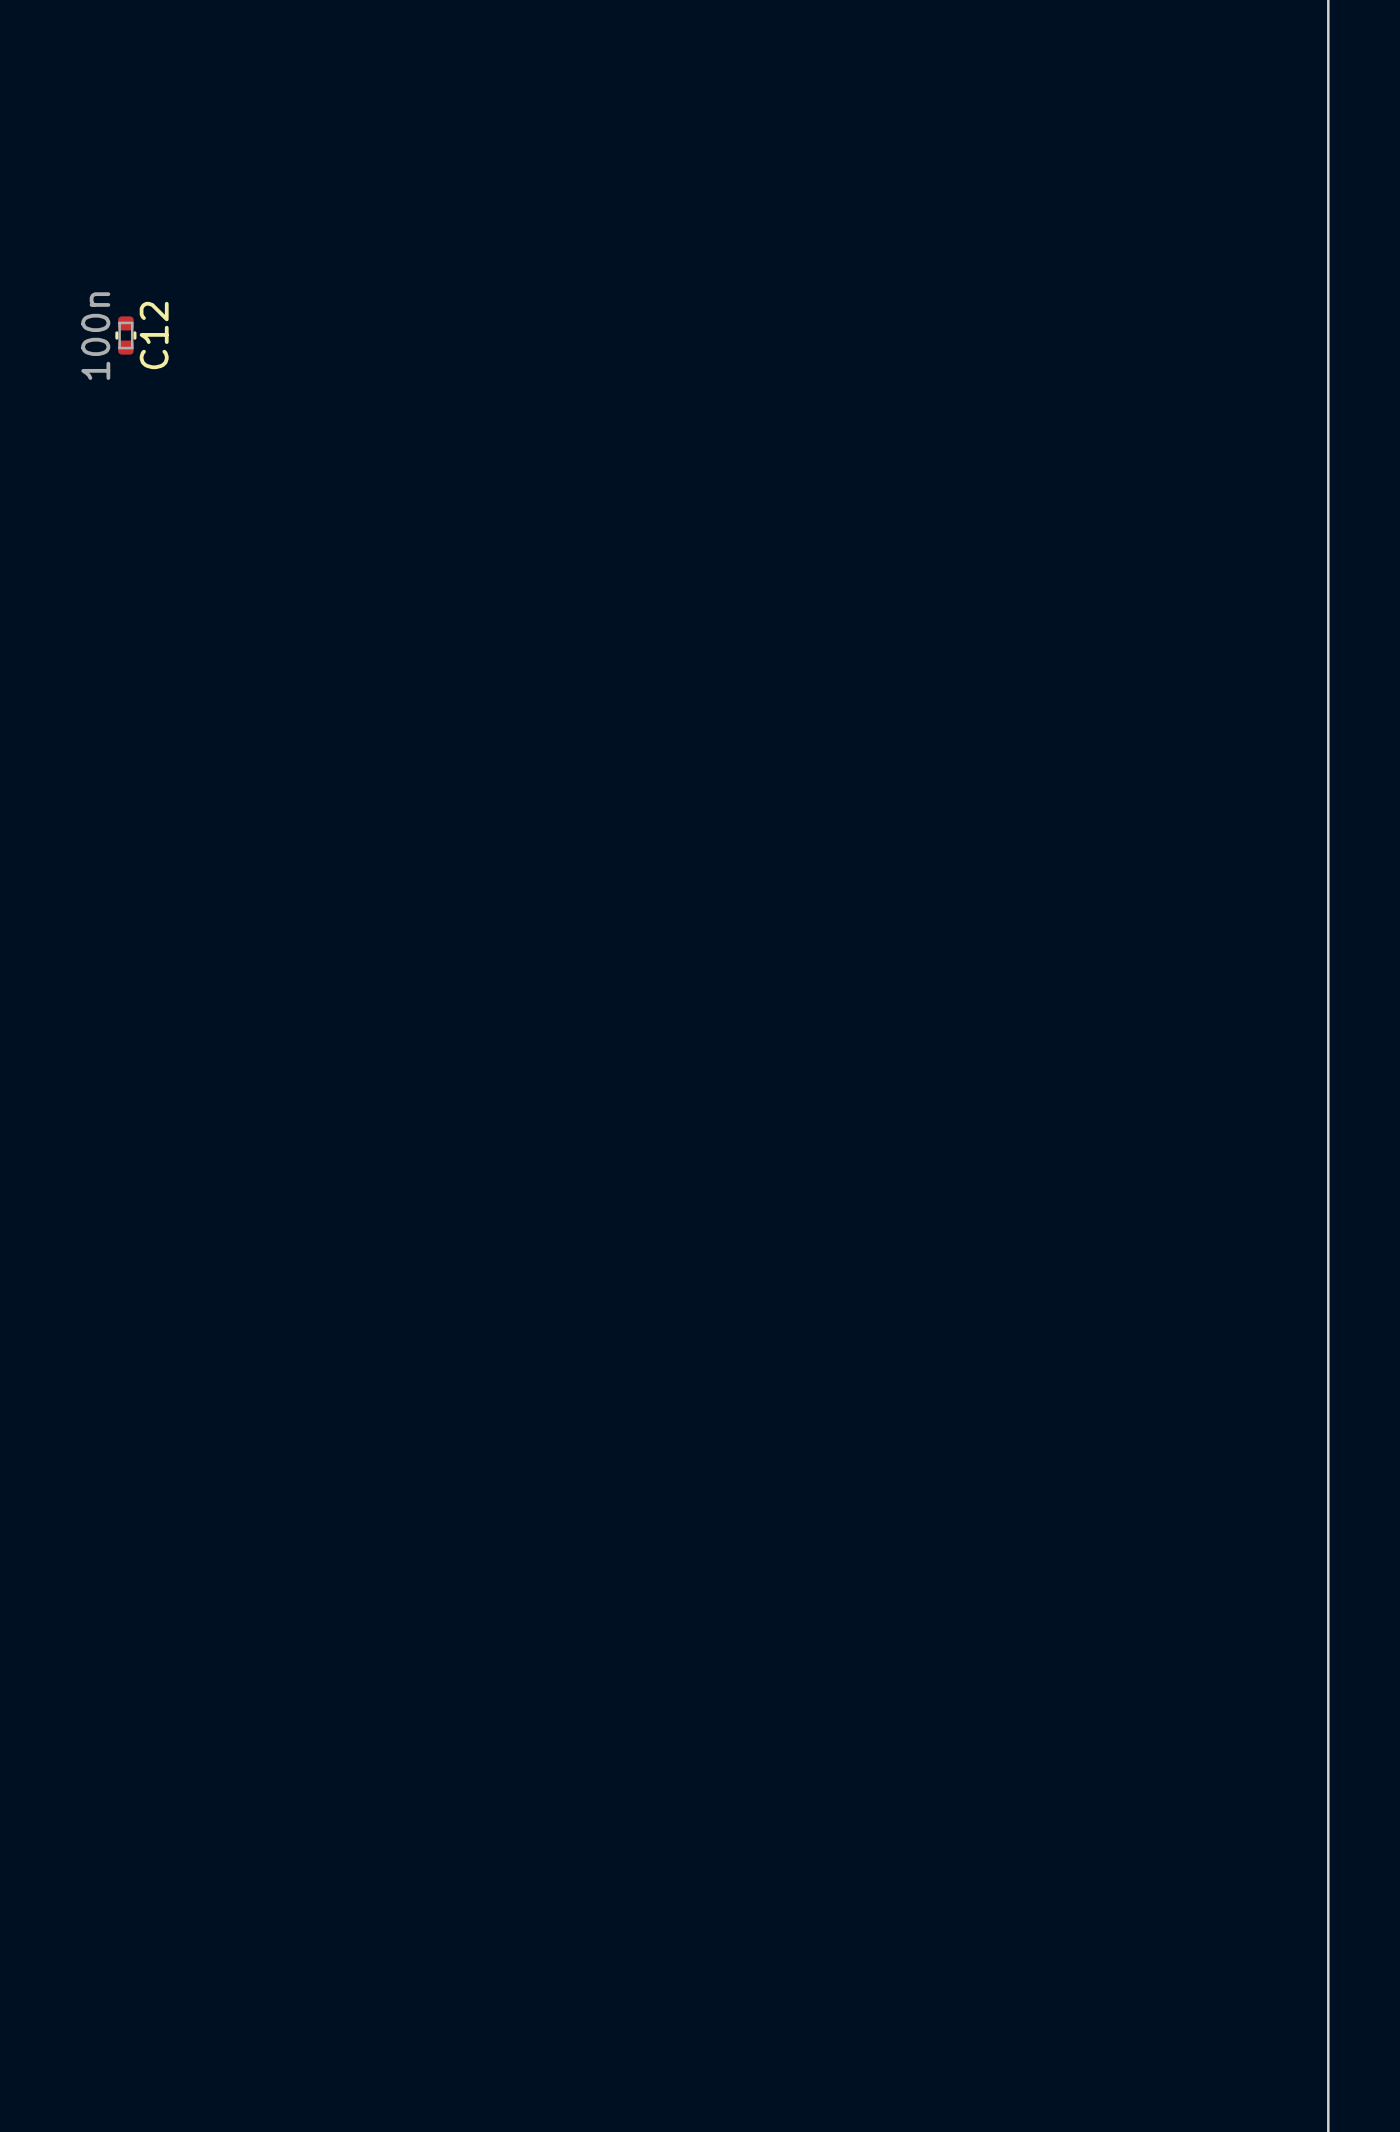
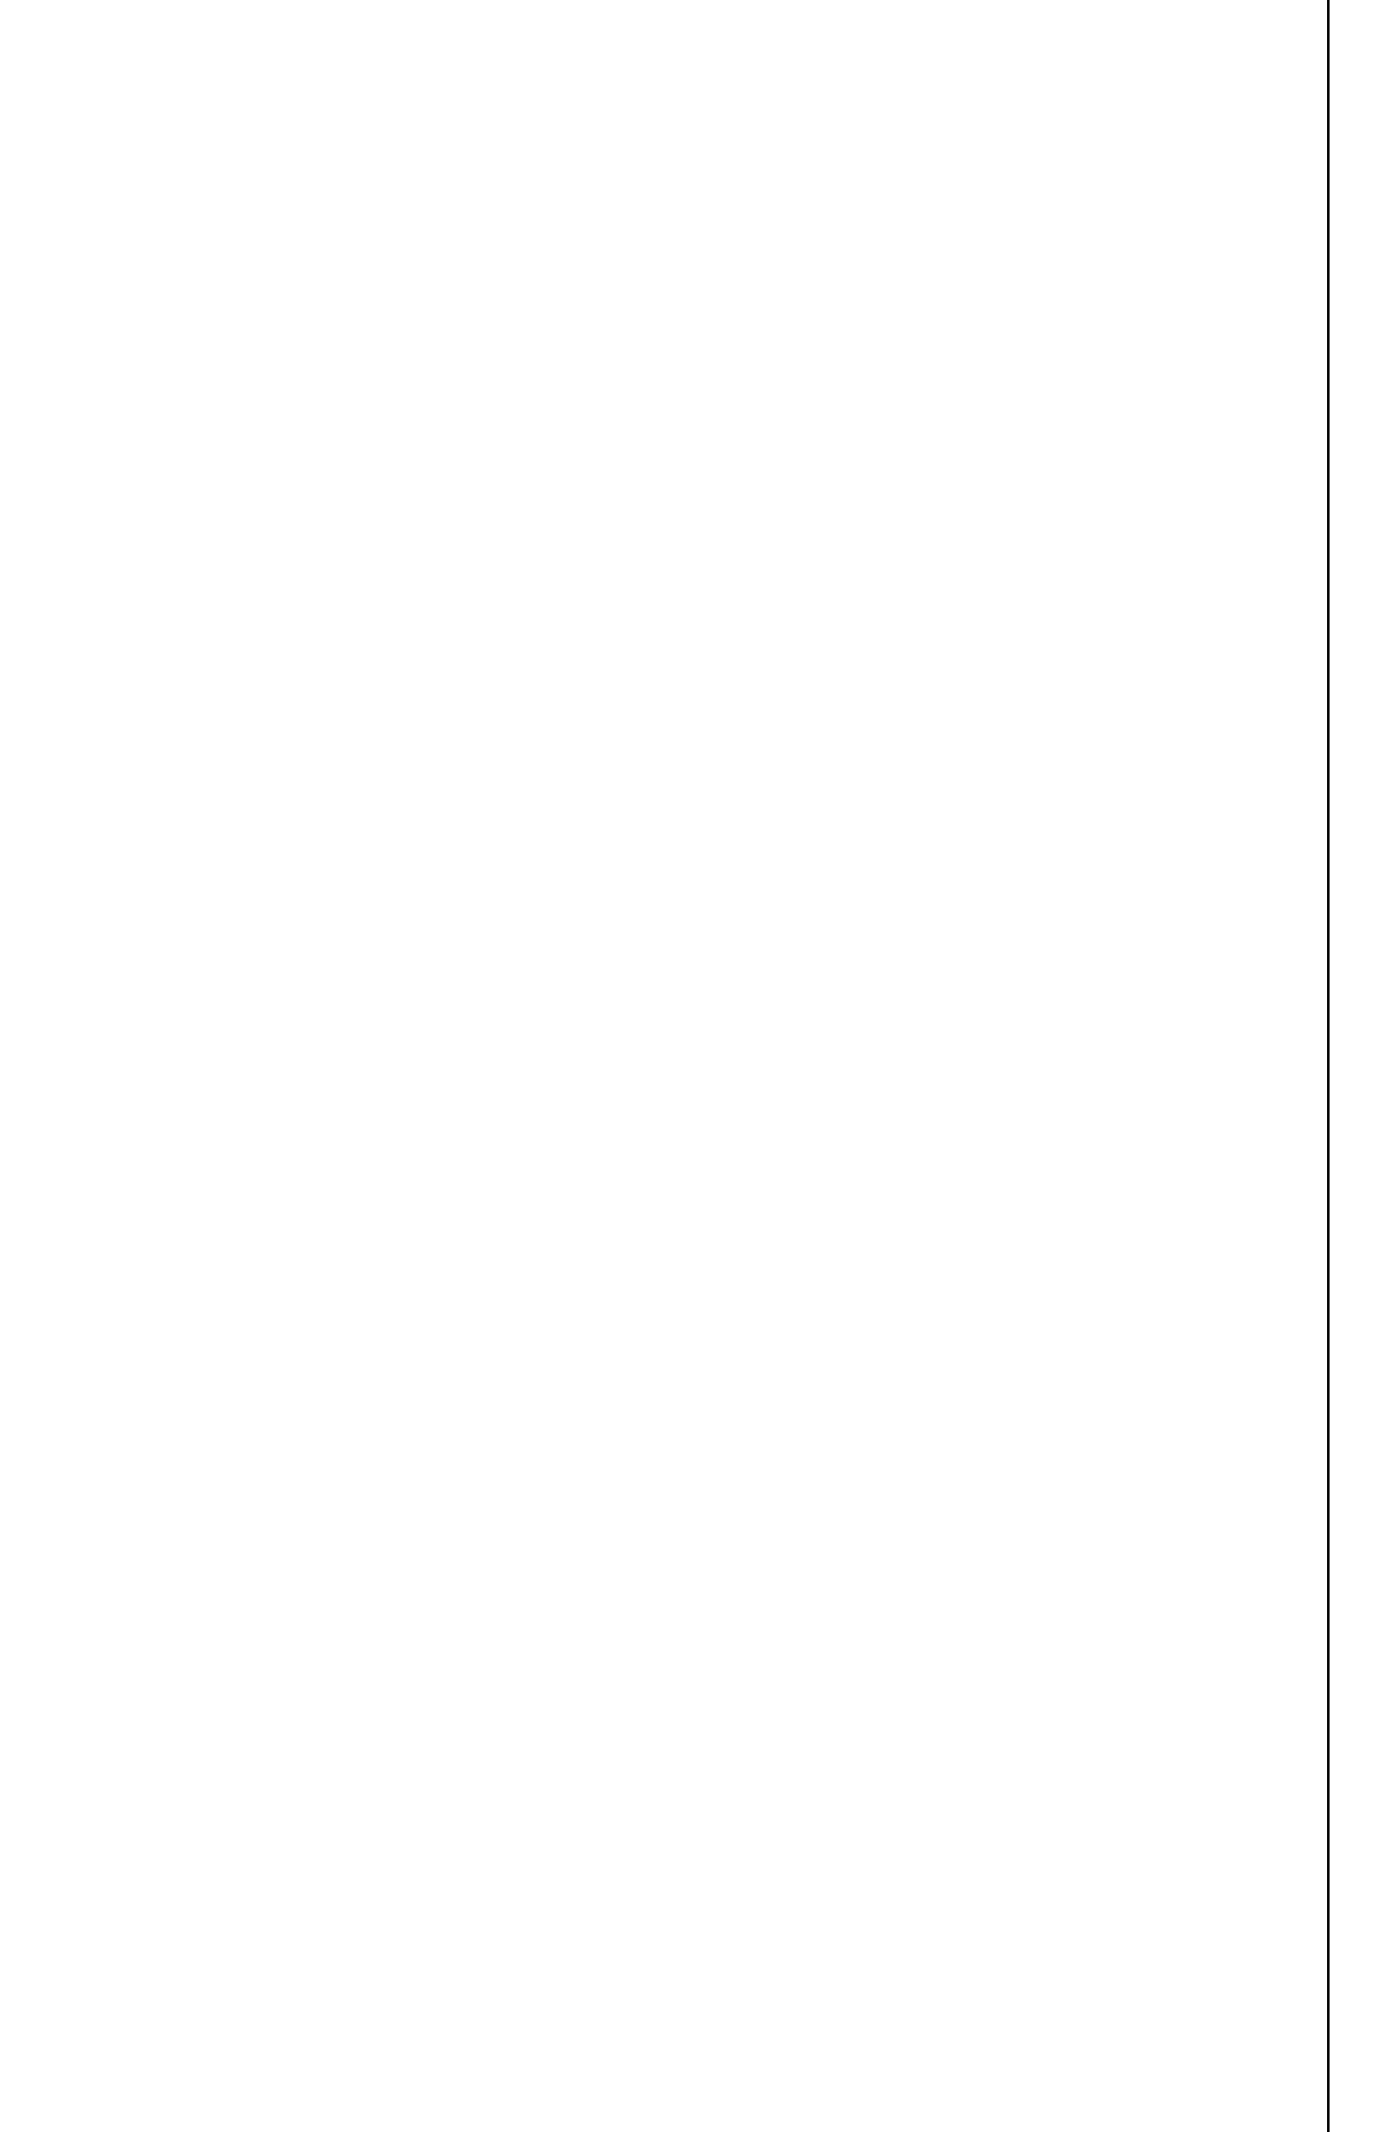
C12: 100n (125, 335) -> none

